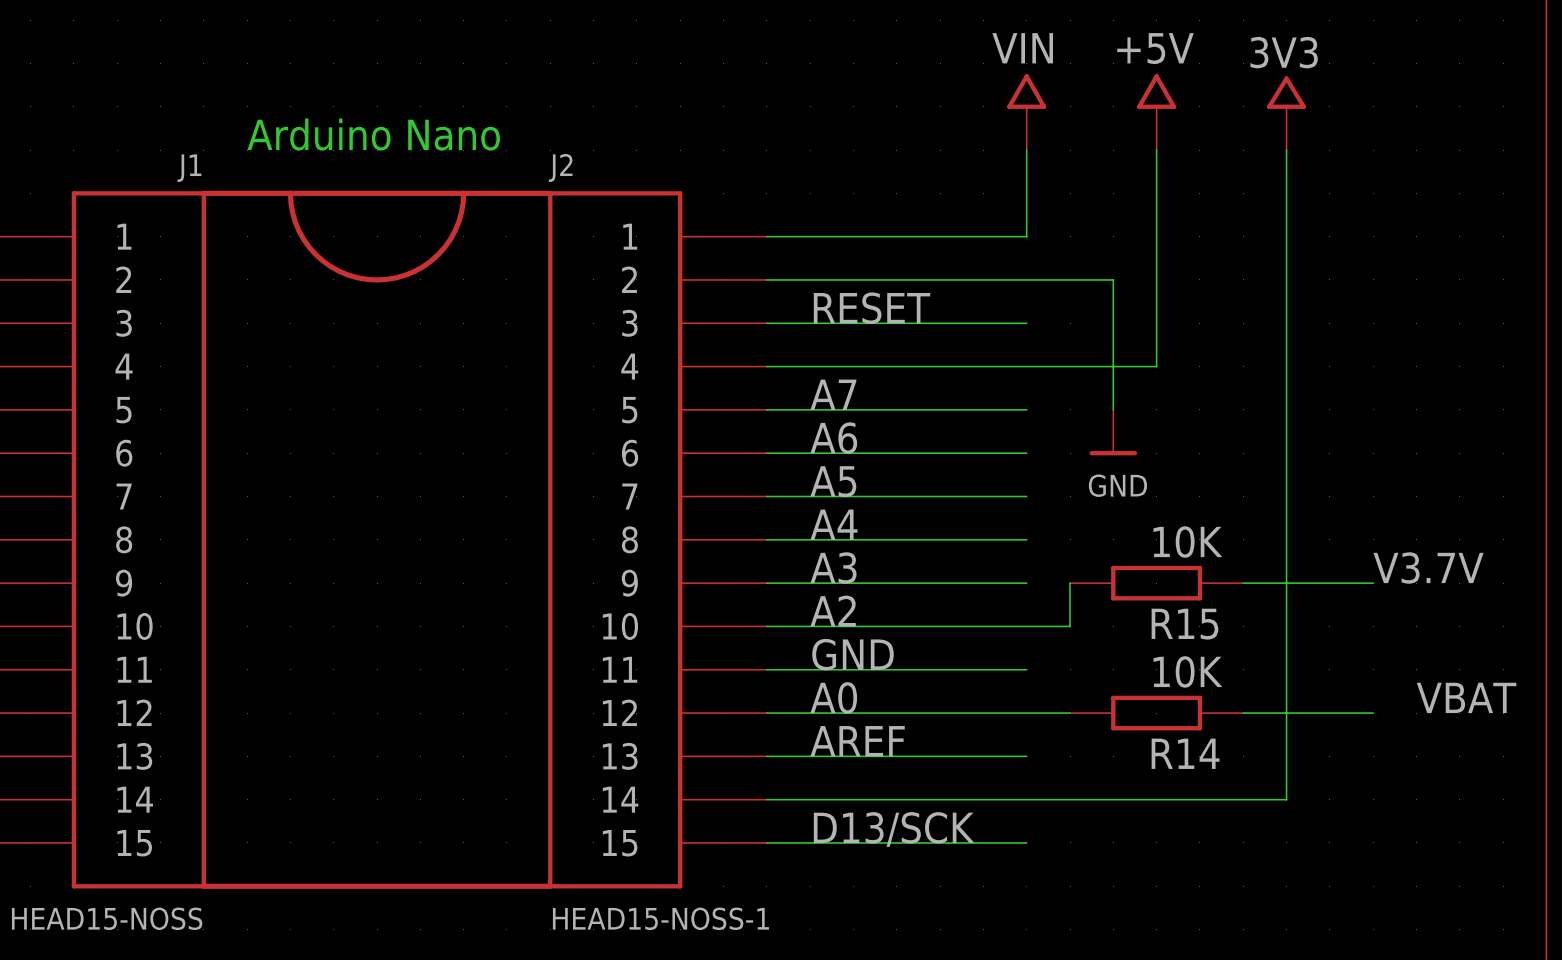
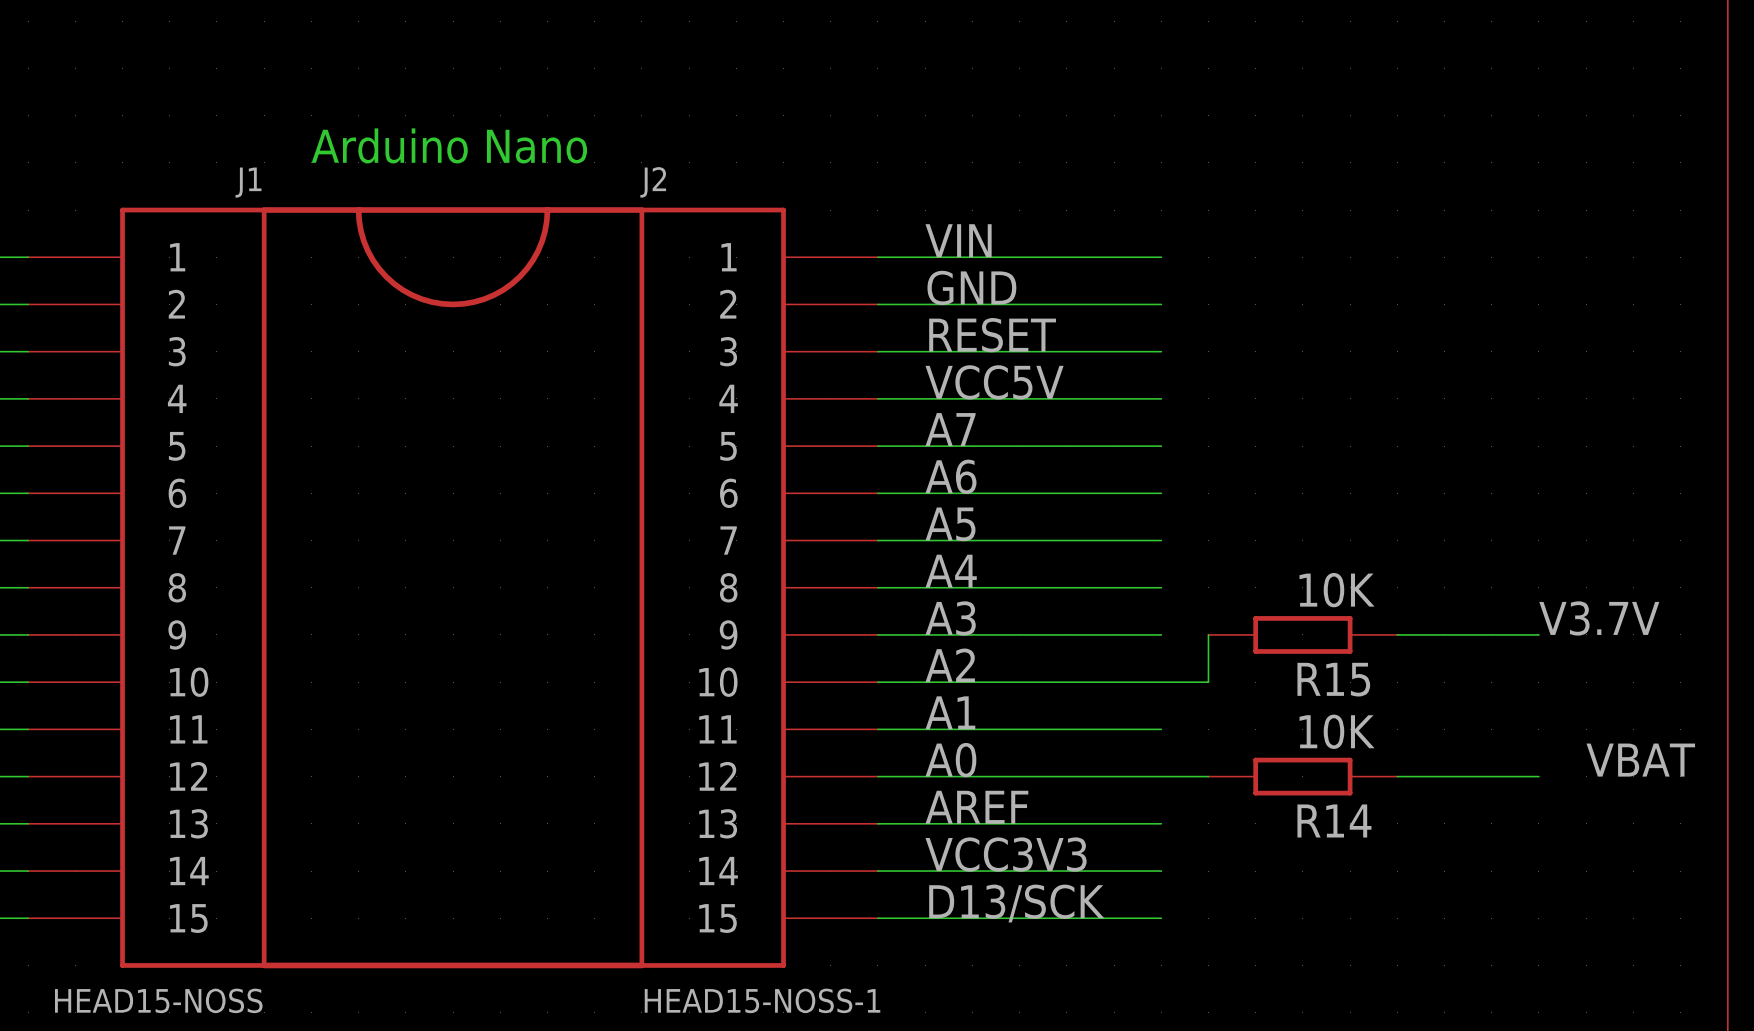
power symbol: VIN (1026, 112) -> none
power symbol: +5V (1156, 112) -> none
power symbol: 3V3 (1286, 113) -> none
wire: (1026, 150) (1026, 236) -> none
wire: (1156, 150) (1156, 366) (1026, 366) -> none
wire: (1286, 150) (1286, 799) (1026, 799) -> none
label: none -> VIN (958, 240)
label: none -> GND (971, 287)
wire: (1026, 279) (1113, 279) (1113, 409) -> none
label: none -> VCC5V (994, 382)
power symbol: GND (1113, 432) -> none
label: GND (853, 654) -> A1 (950, 712)
label: none -> VCC3V3 (1006, 854)

